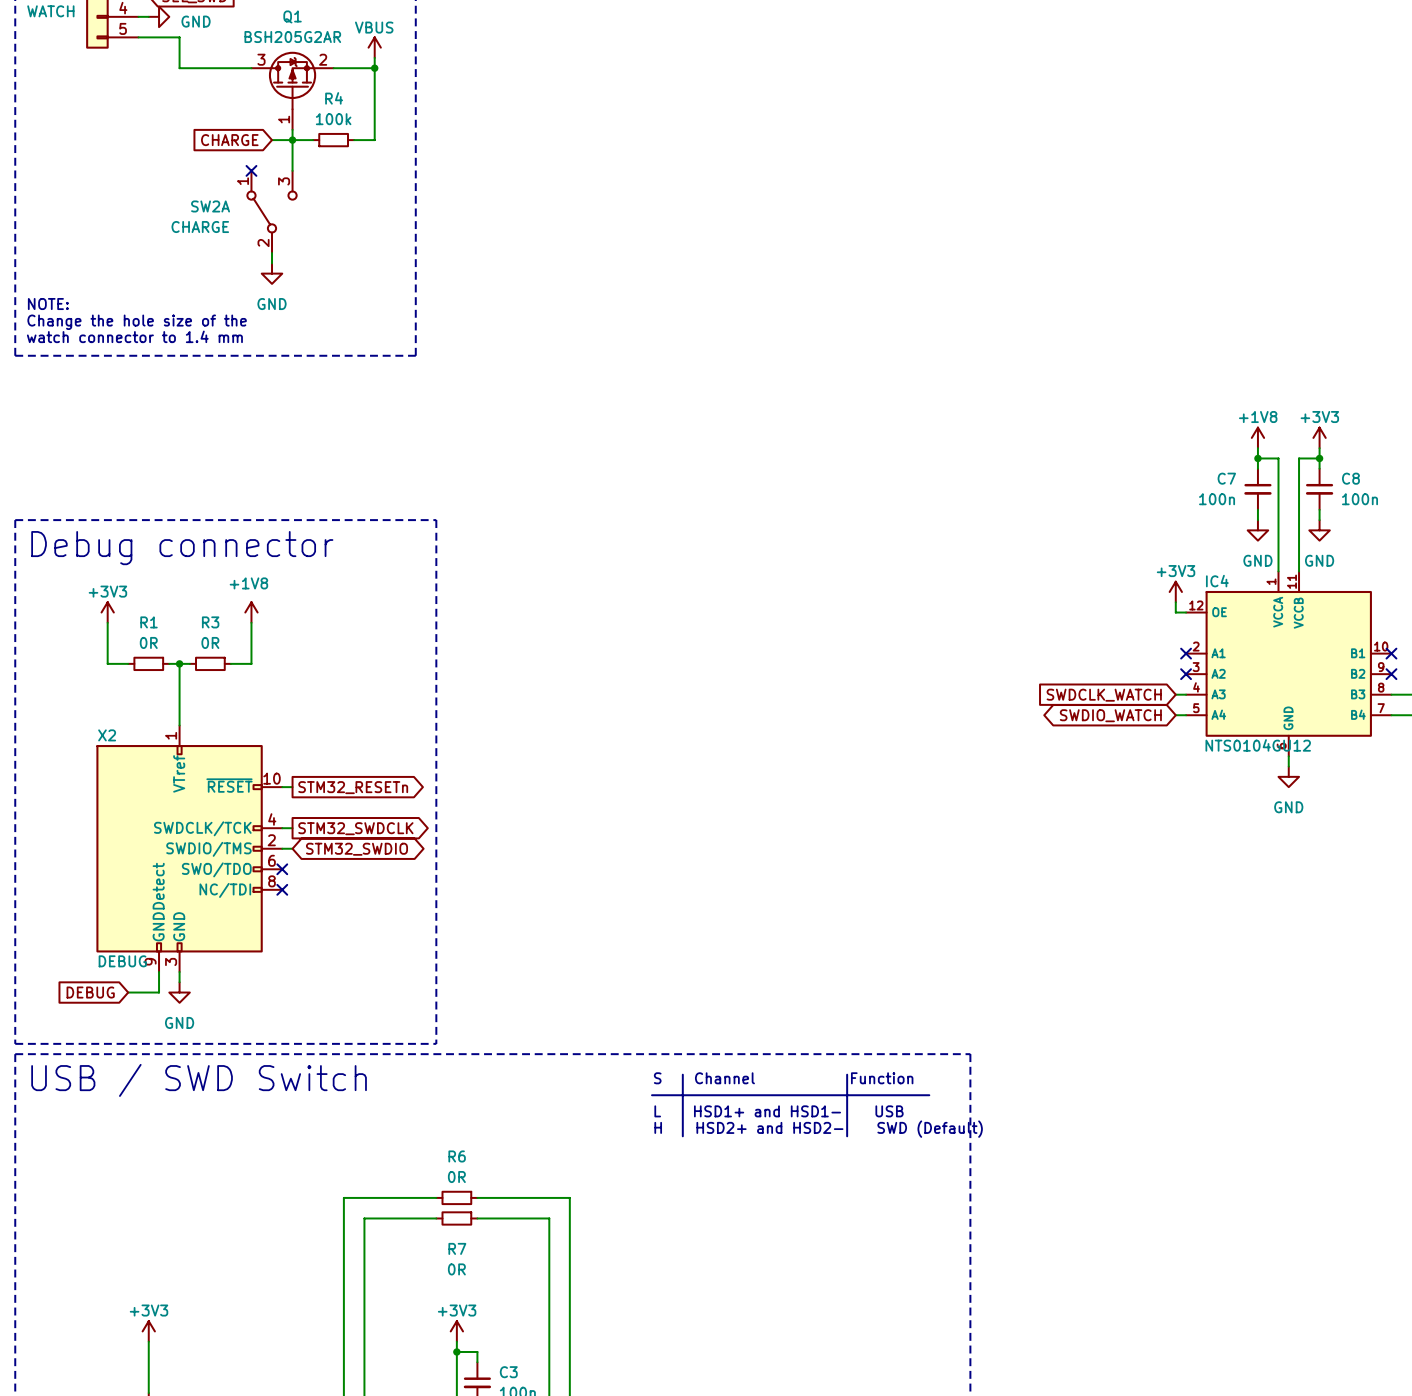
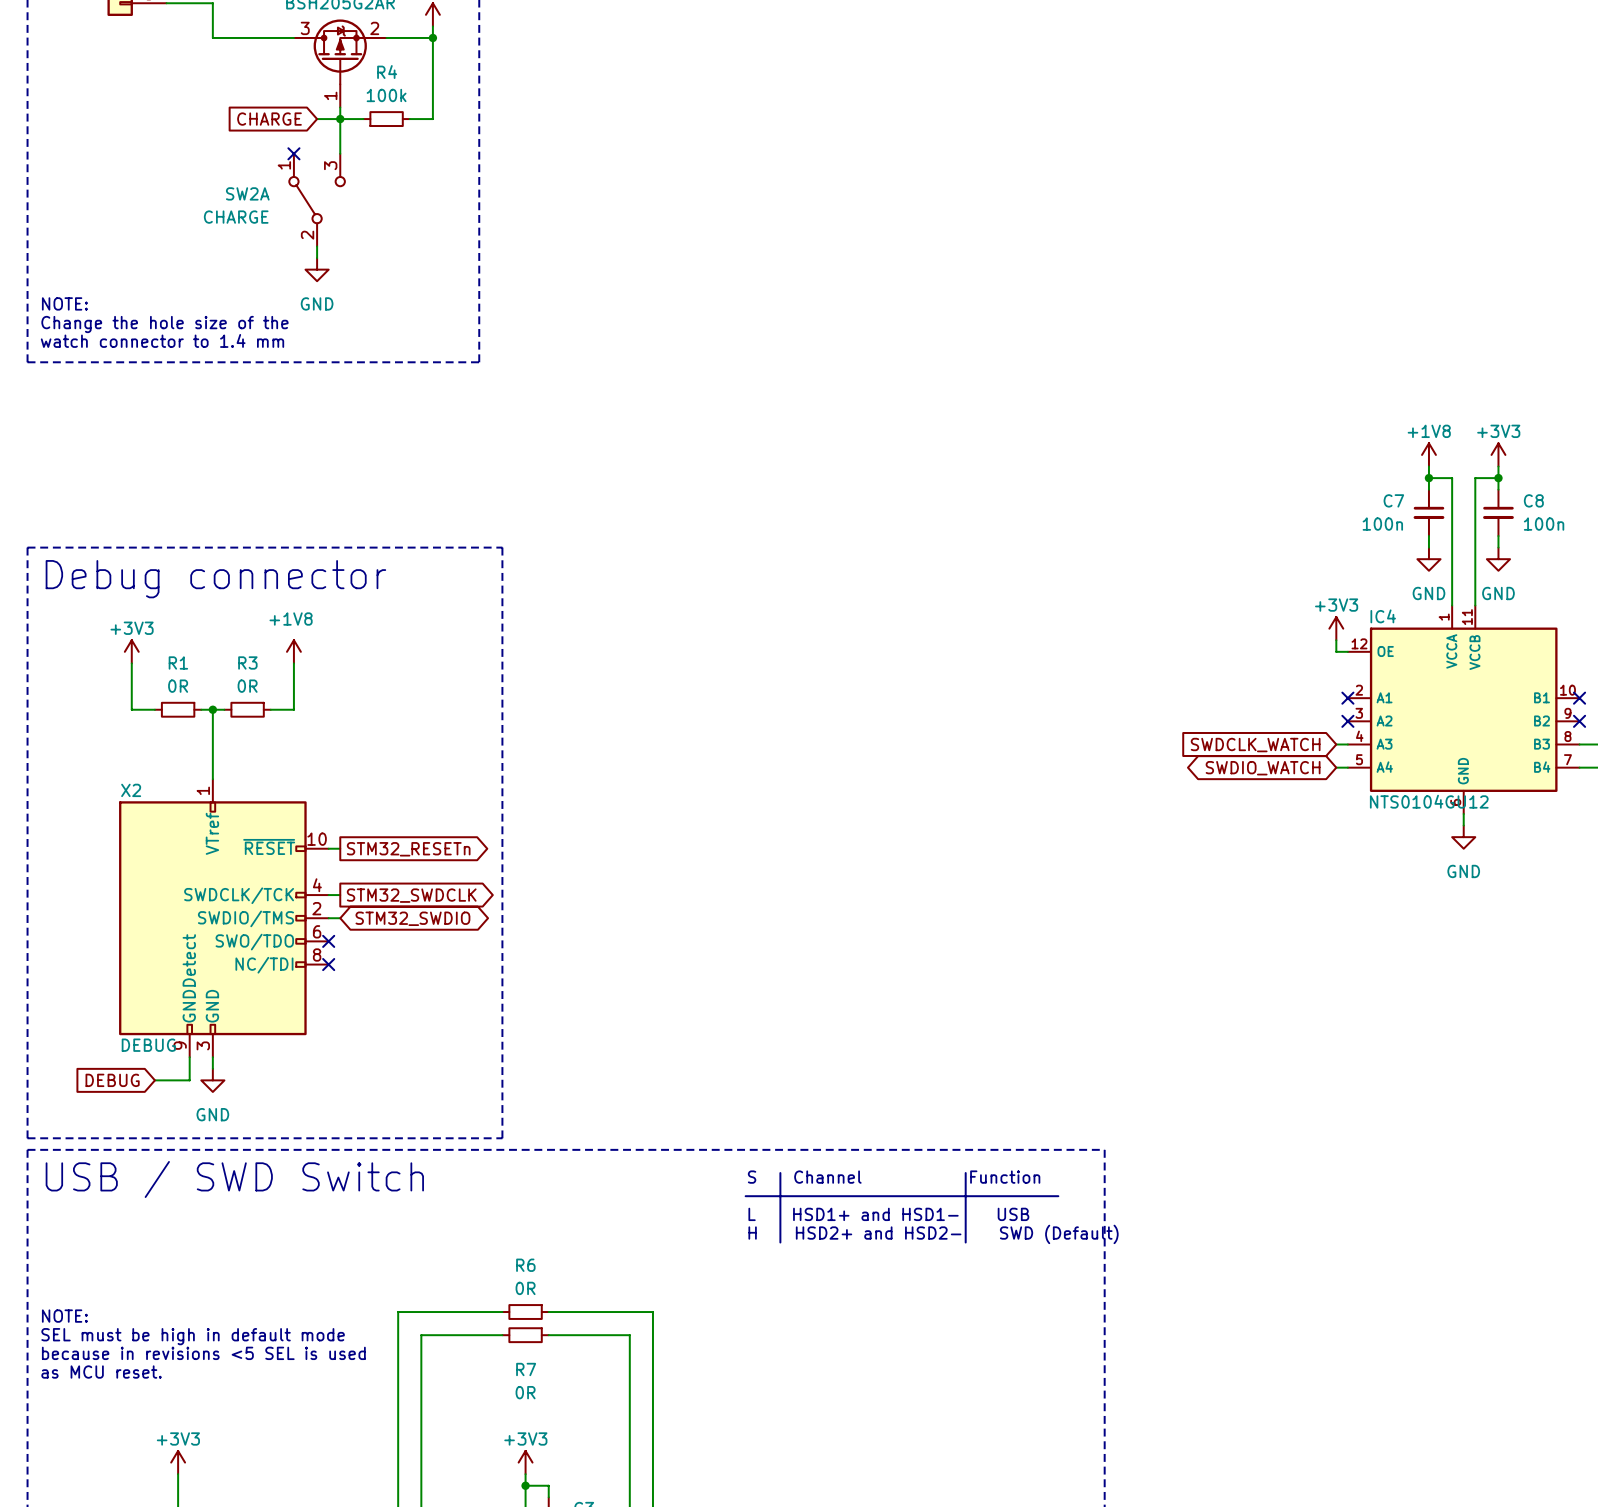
text: none -> NOTE: (64, 1316)
text: none -> SEL must be high in default mode (193, 1336)
text: none -> because in revisions <5 SEL is used (203, 1353)
text: none -> as MCU reset. (101, 1372)

